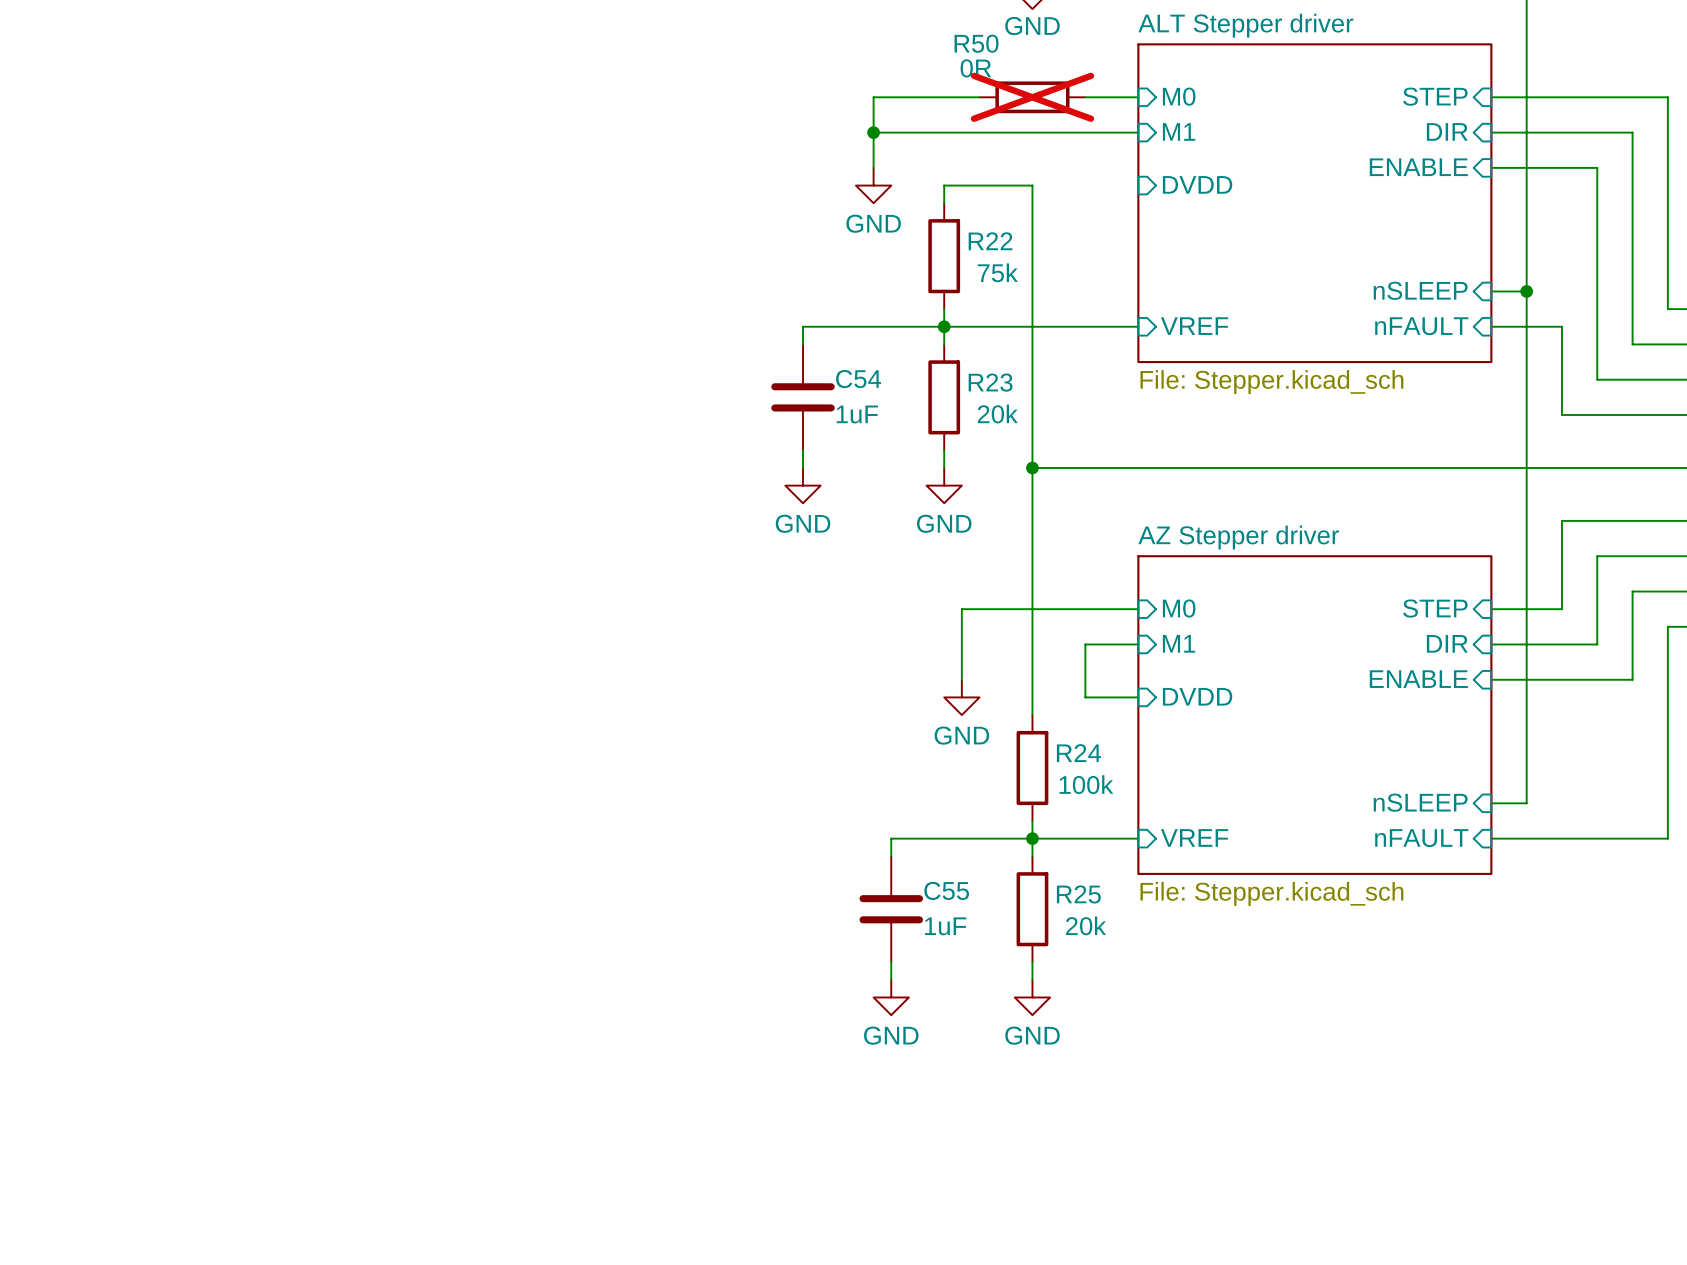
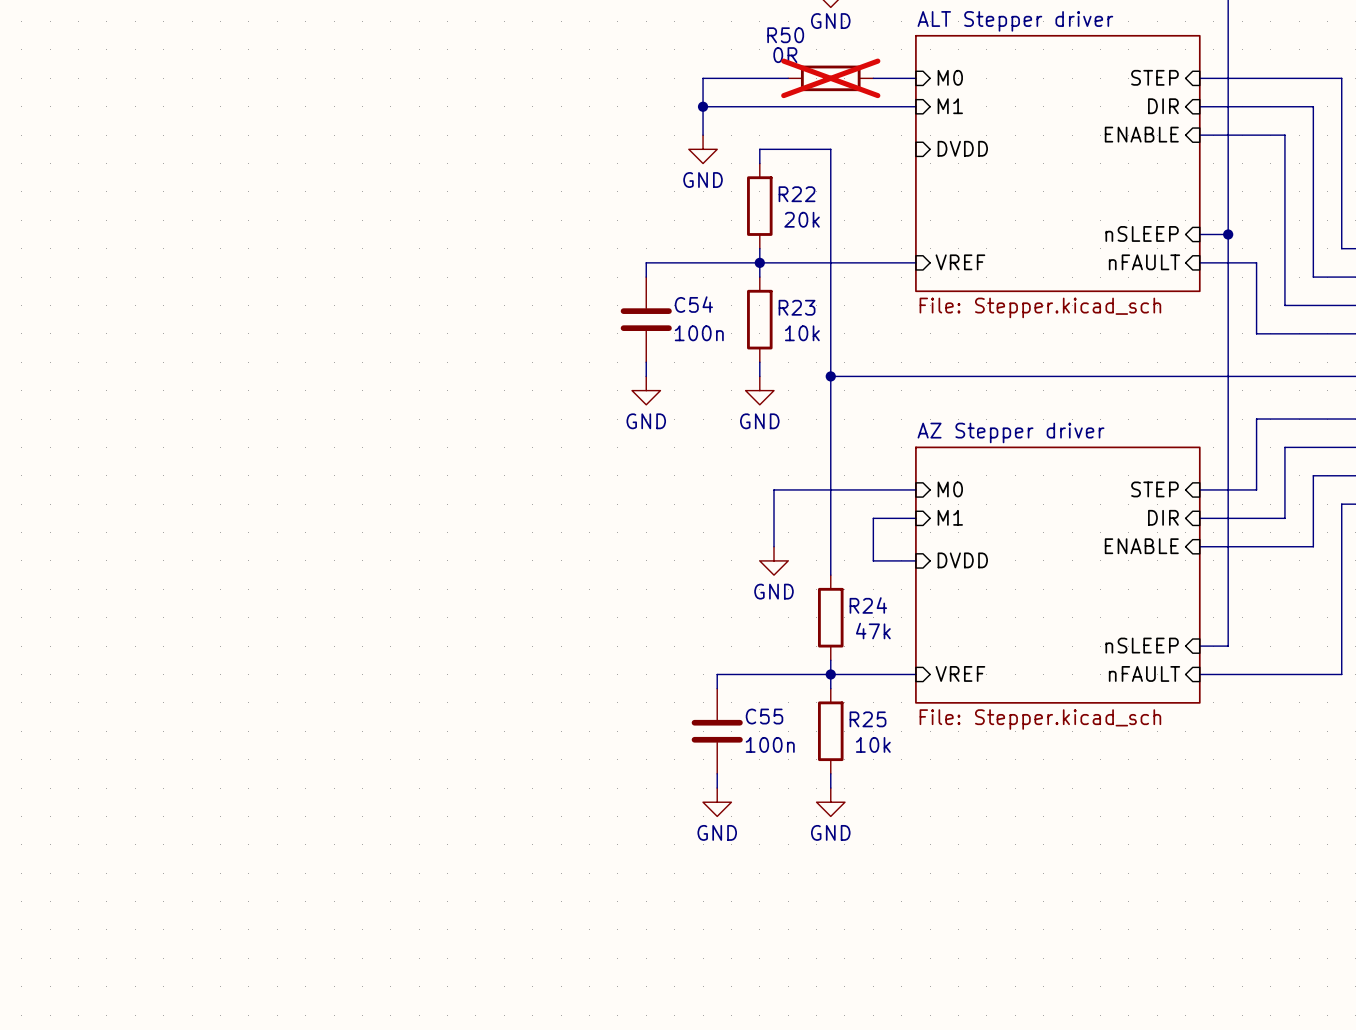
R22 value: 75k (997, 272) -> 20k (802, 219)
C54 value: 1uF (857, 414) -> 100n (699, 333)
R23 value: 20k (997, 414) -> 10k (802, 333)
R24 value: 100k (1086, 784) -> 47k (873, 631)
R25 value: 20k (1086, 925) -> 10k (873, 744)
C55 value: 1uF (945, 926) -> 100n (770, 744)

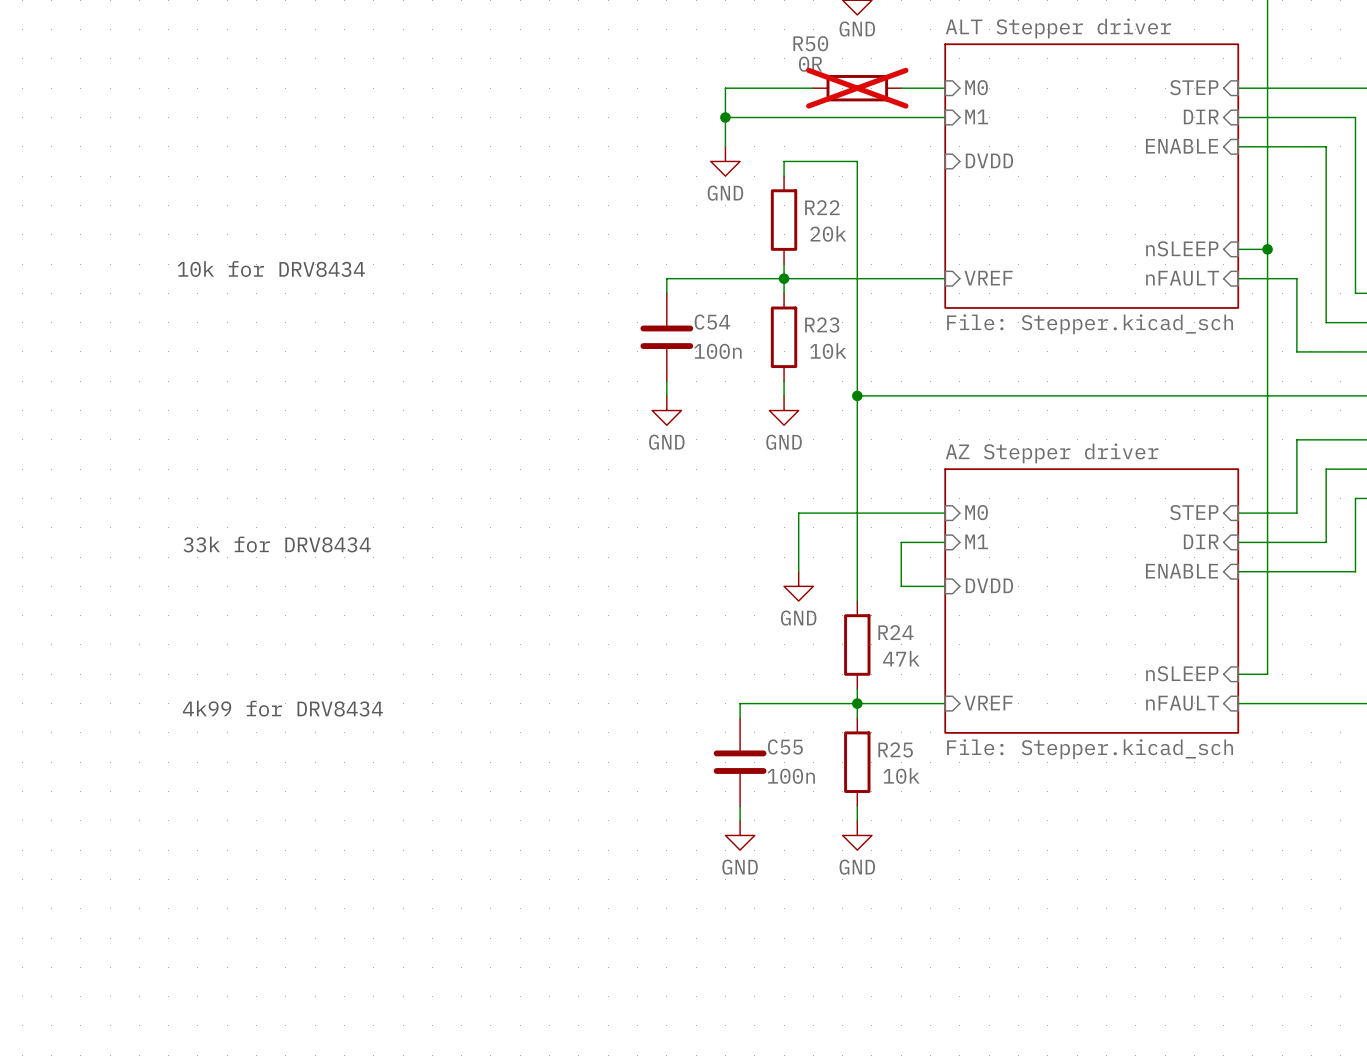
text: none -> 10k for DRV8434 (271, 269)
text: none -> 33k for DRV8434 (277, 544)
text: none -> 4k99 for DRV8434 (282, 708)

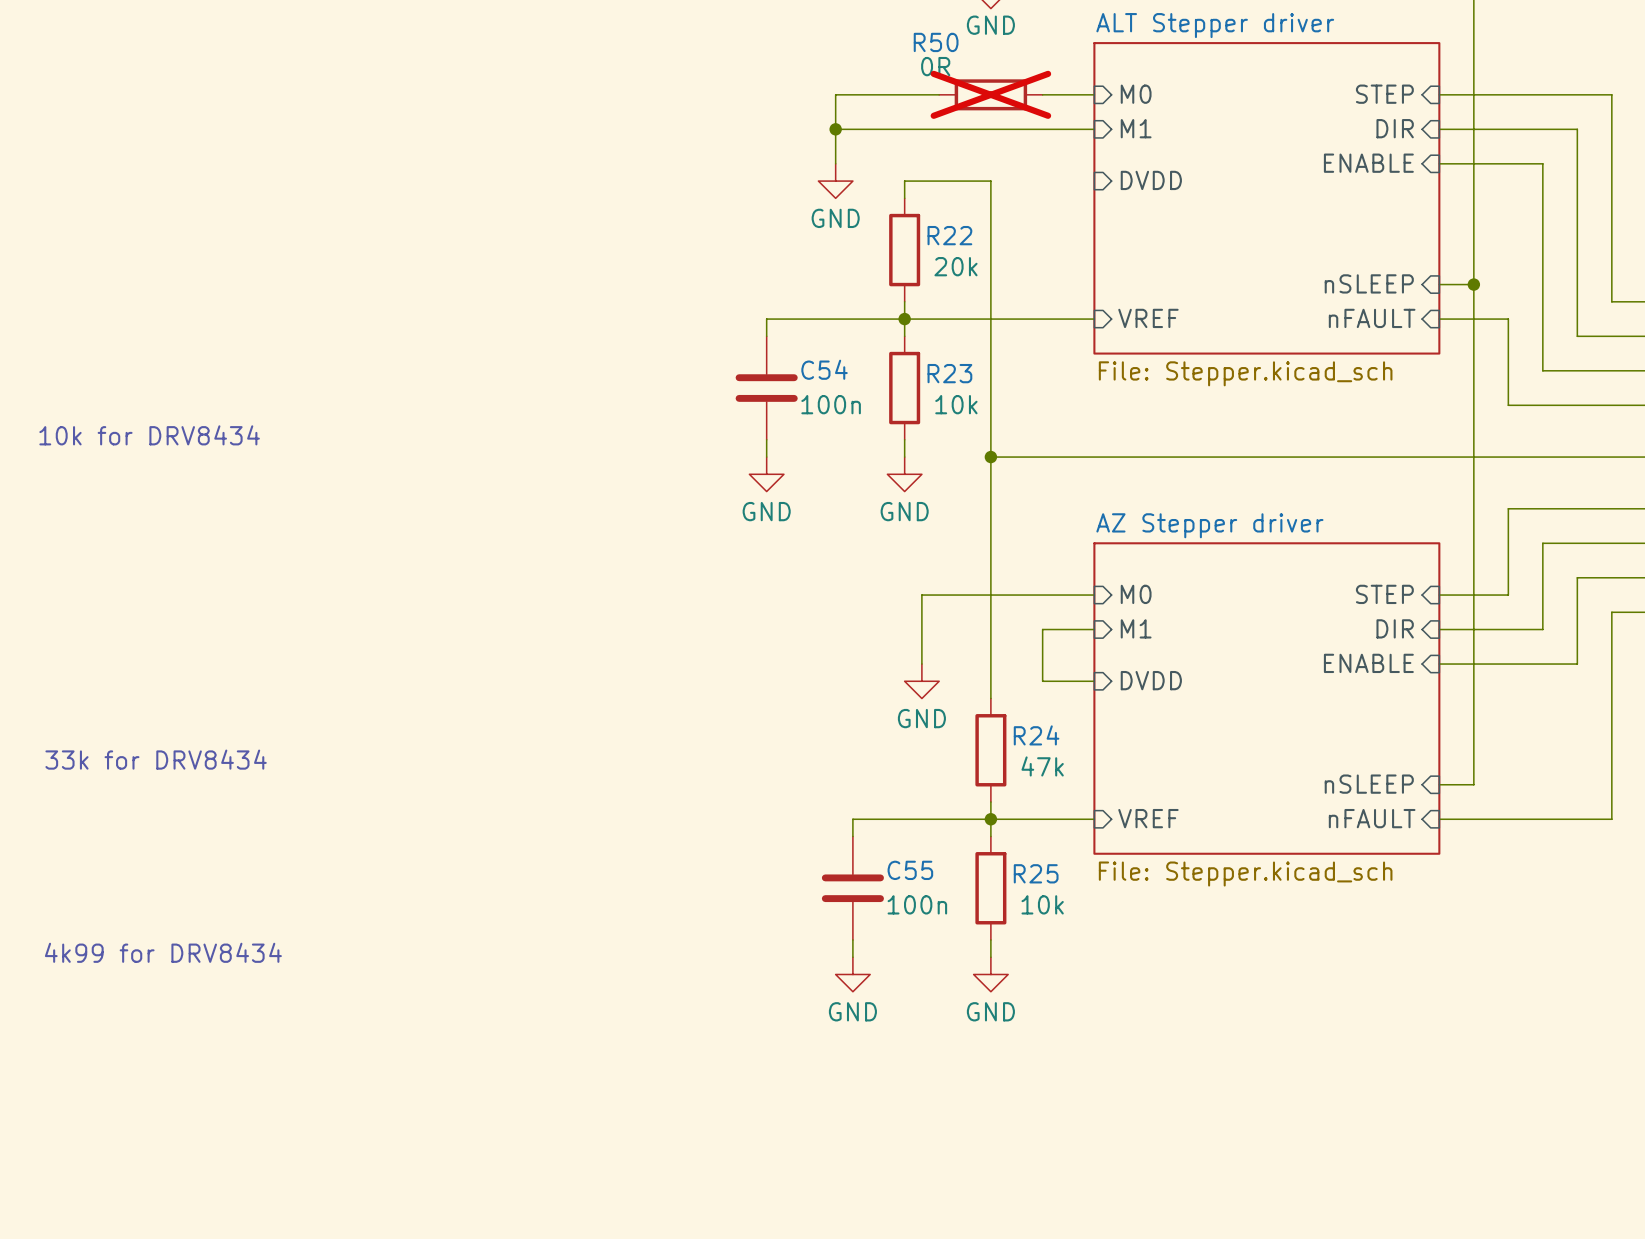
text position: 10k for DRV8434 (271, 269) -> 10k for DRV8434 (149, 435)
text position: 33k for DRV8434 (277, 544) -> 33k for DRV8434 (156, 759)
text position: 4k99 for DRV8434 (282, 708) -> 4k99 for DRV8434 (163, 952)

